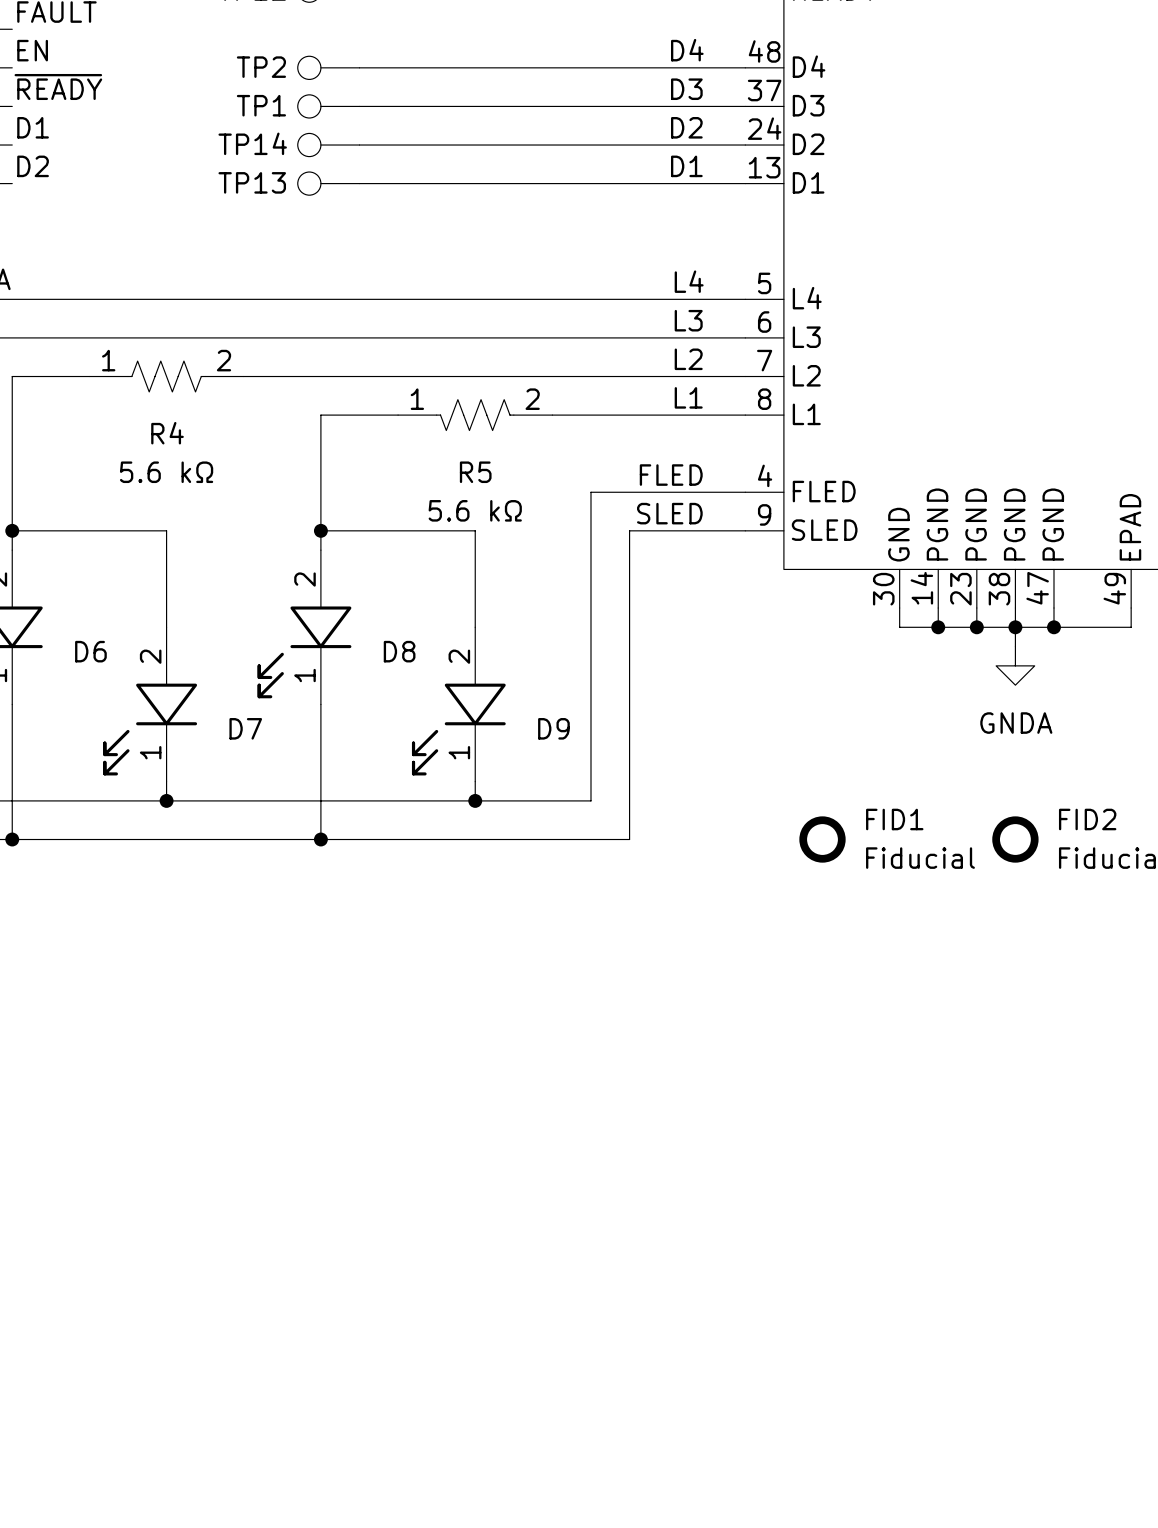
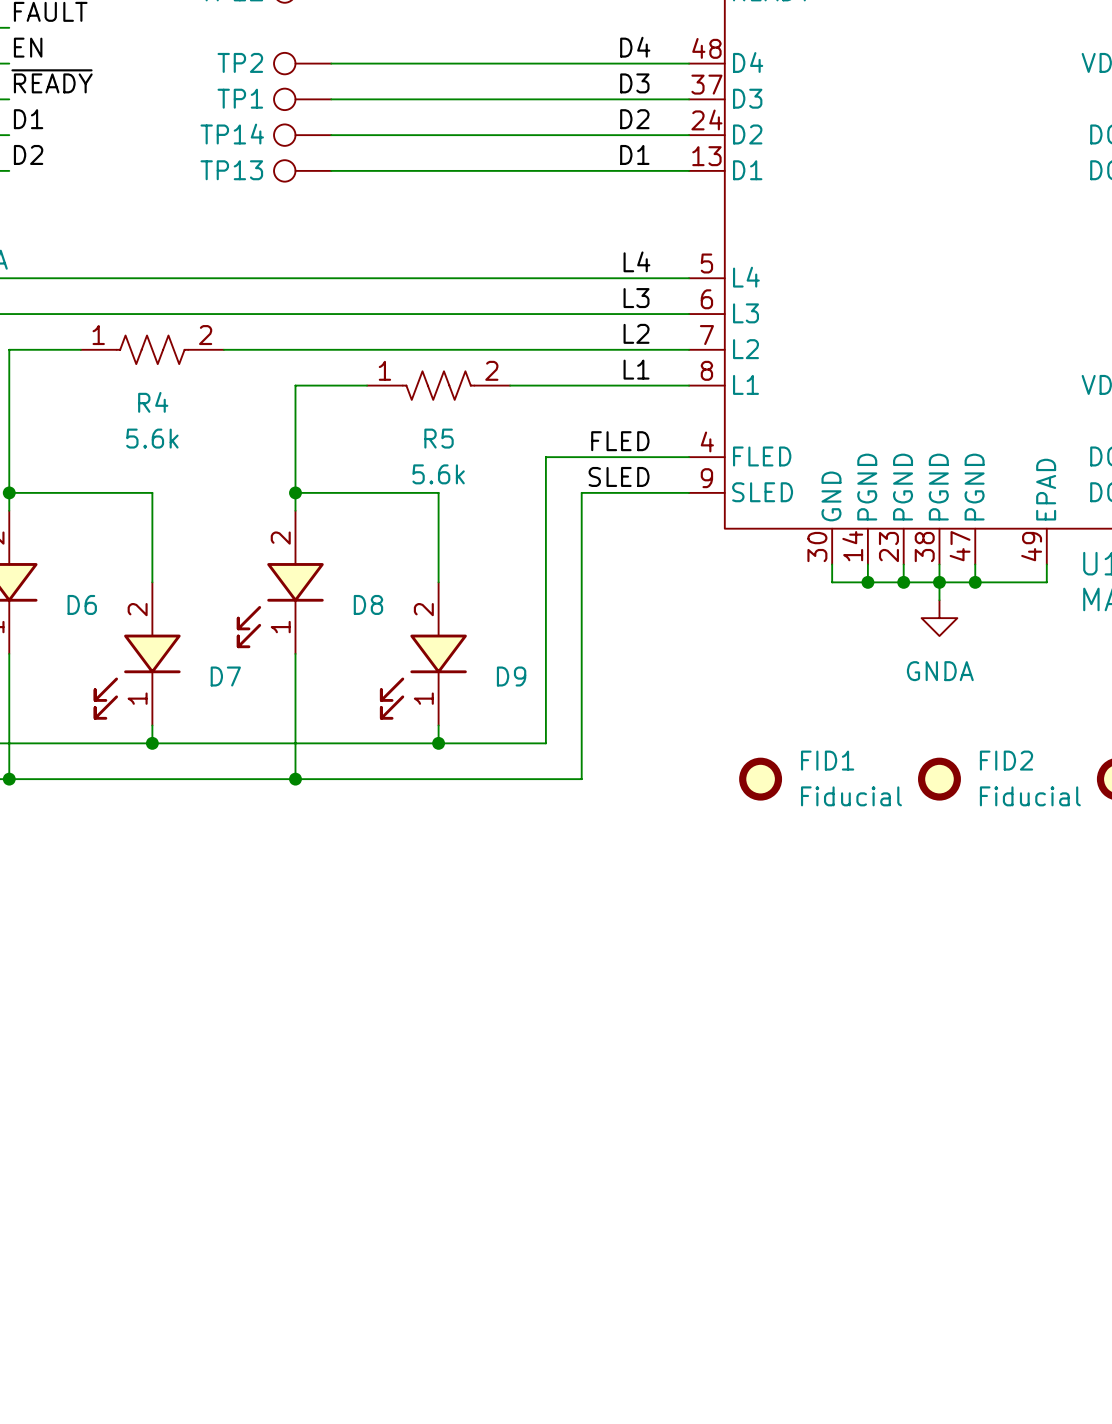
R4 value: 5.6 kΩ (166, 472) -> 5.6k (152, 438)
R5 value: 5.6 kΩ (475, 510) -> 5.6k (438, 474)

